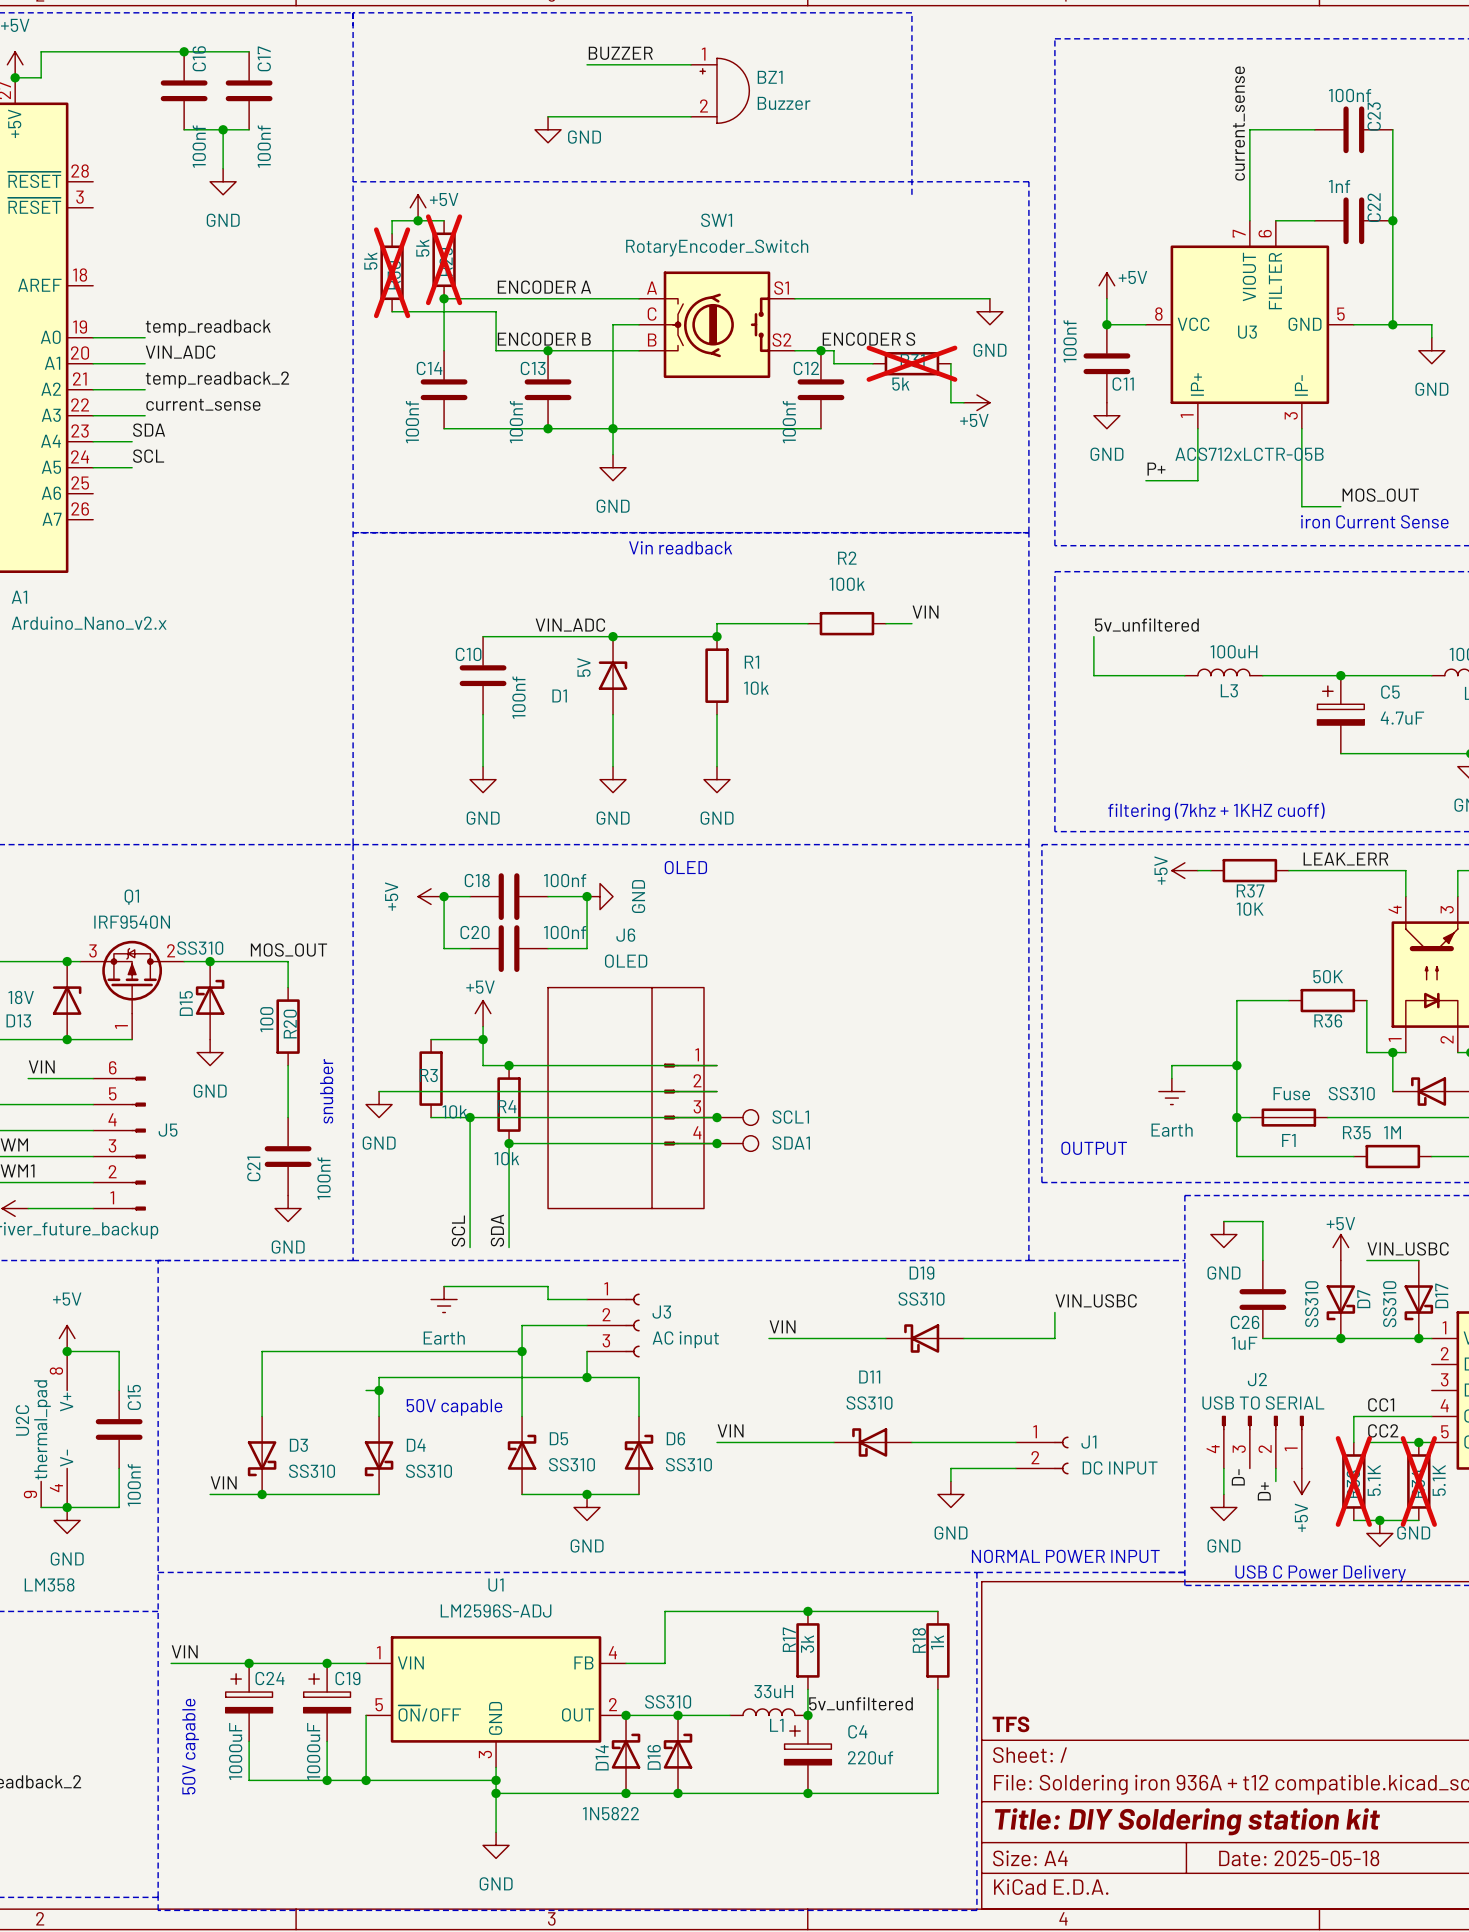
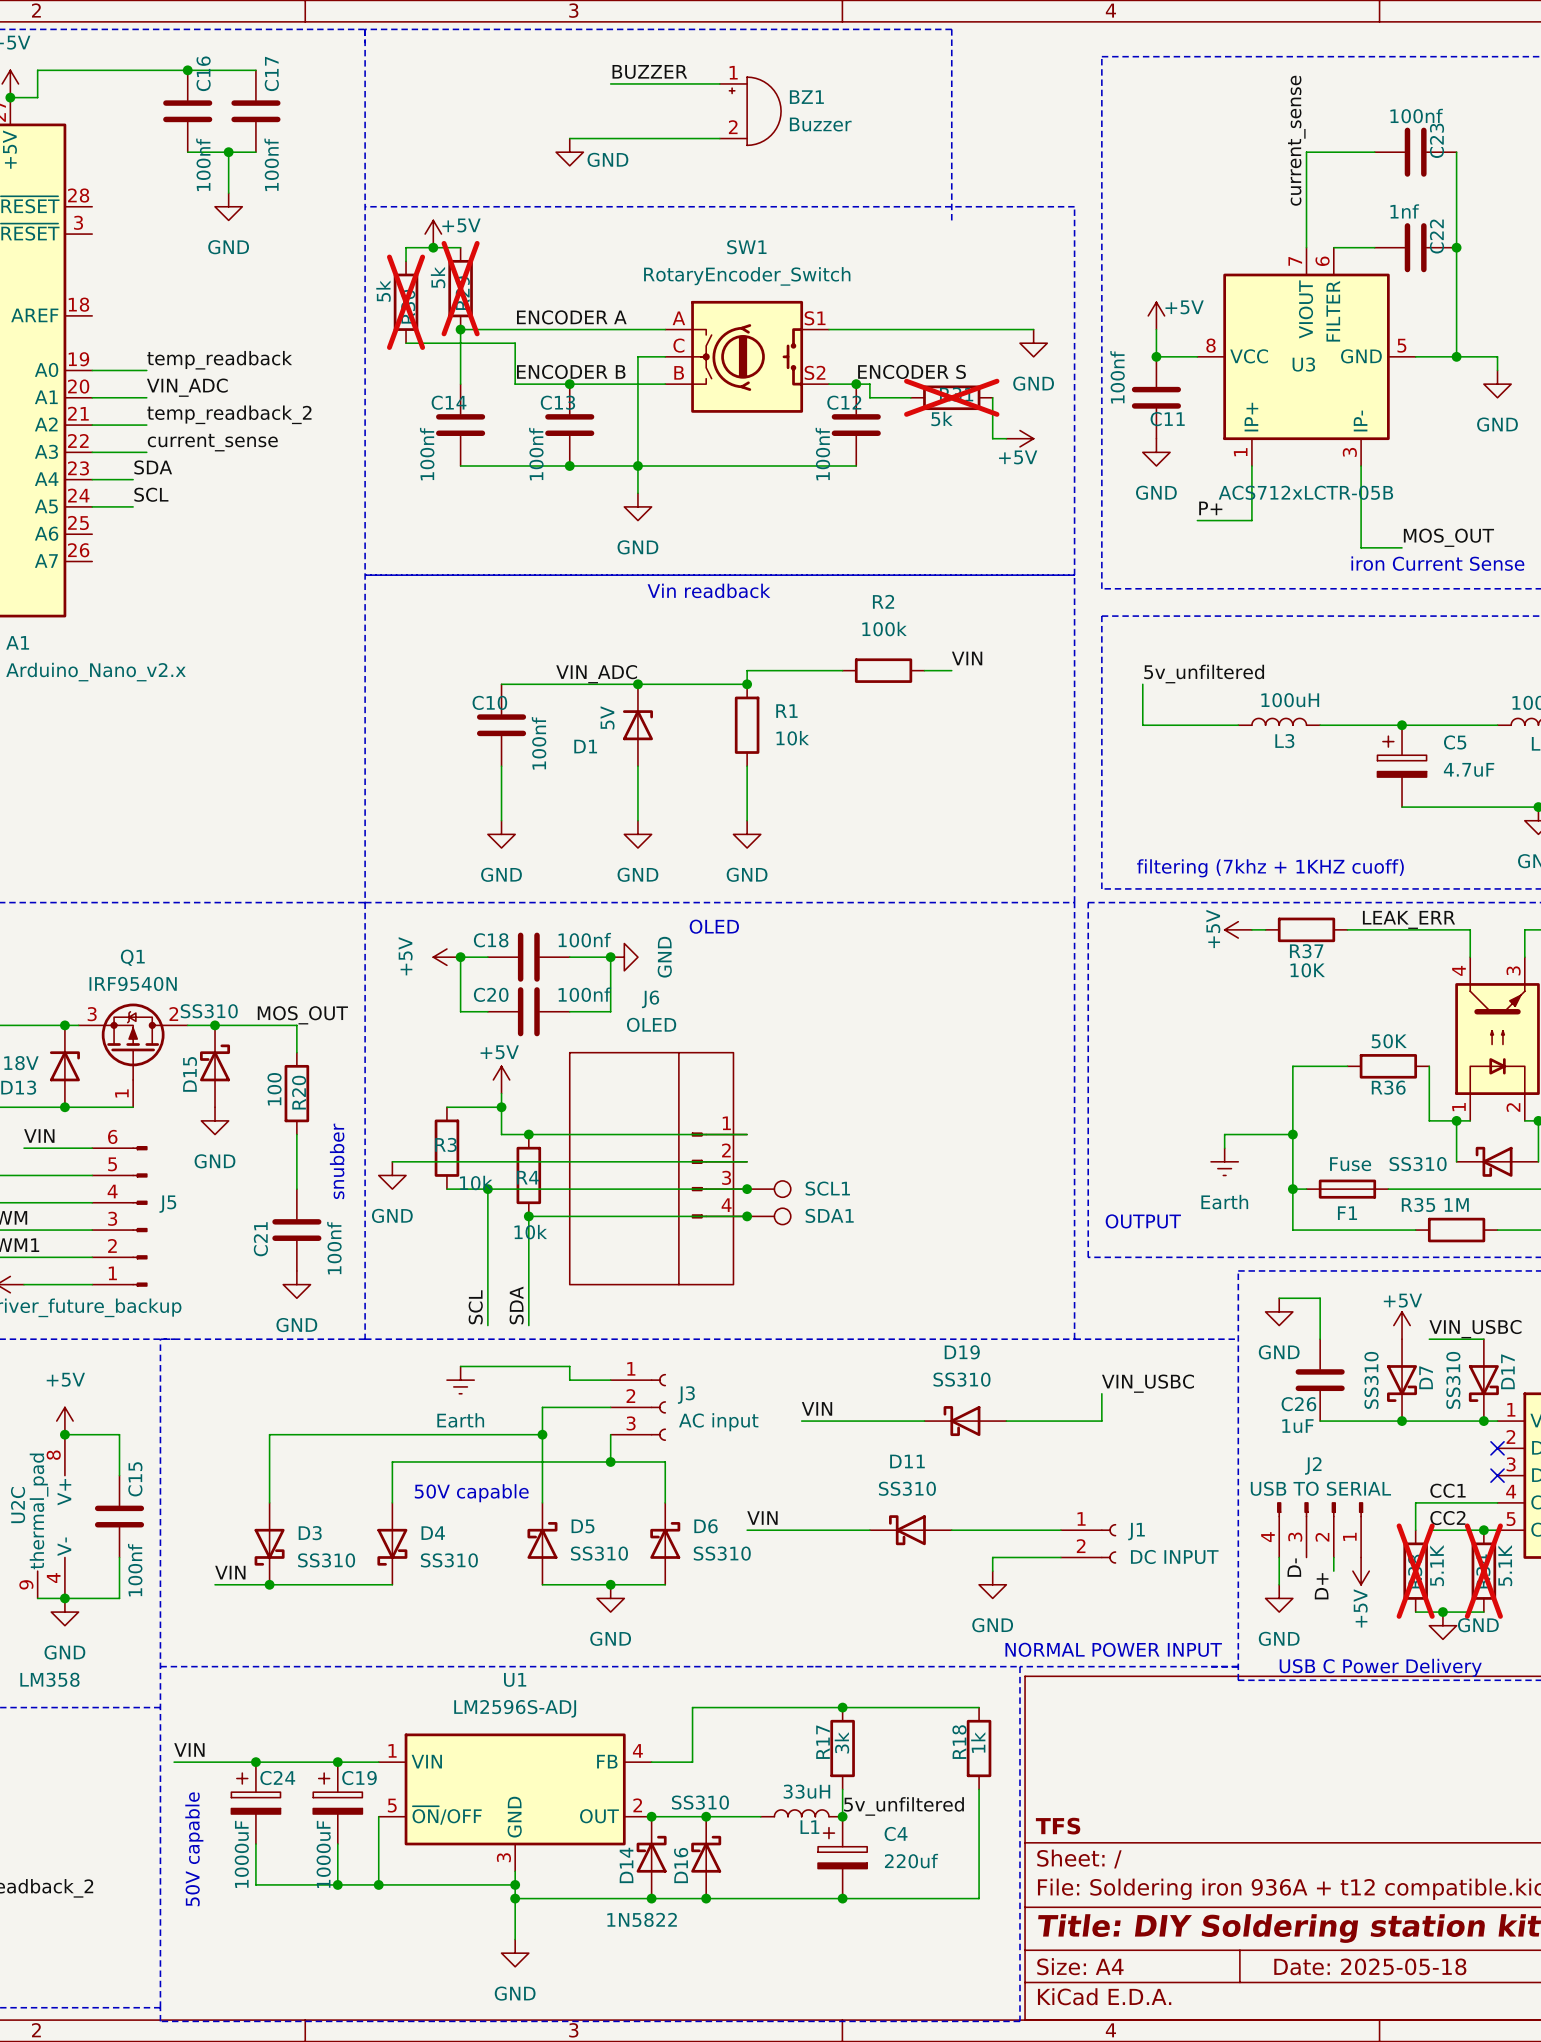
no-connect mark: none -> (1497, 1448)
wire: (366, 1390) (379, 1390) -> none
junction: (379, 1390) -> none
no-connect mark: none -> (1497, 1475)

